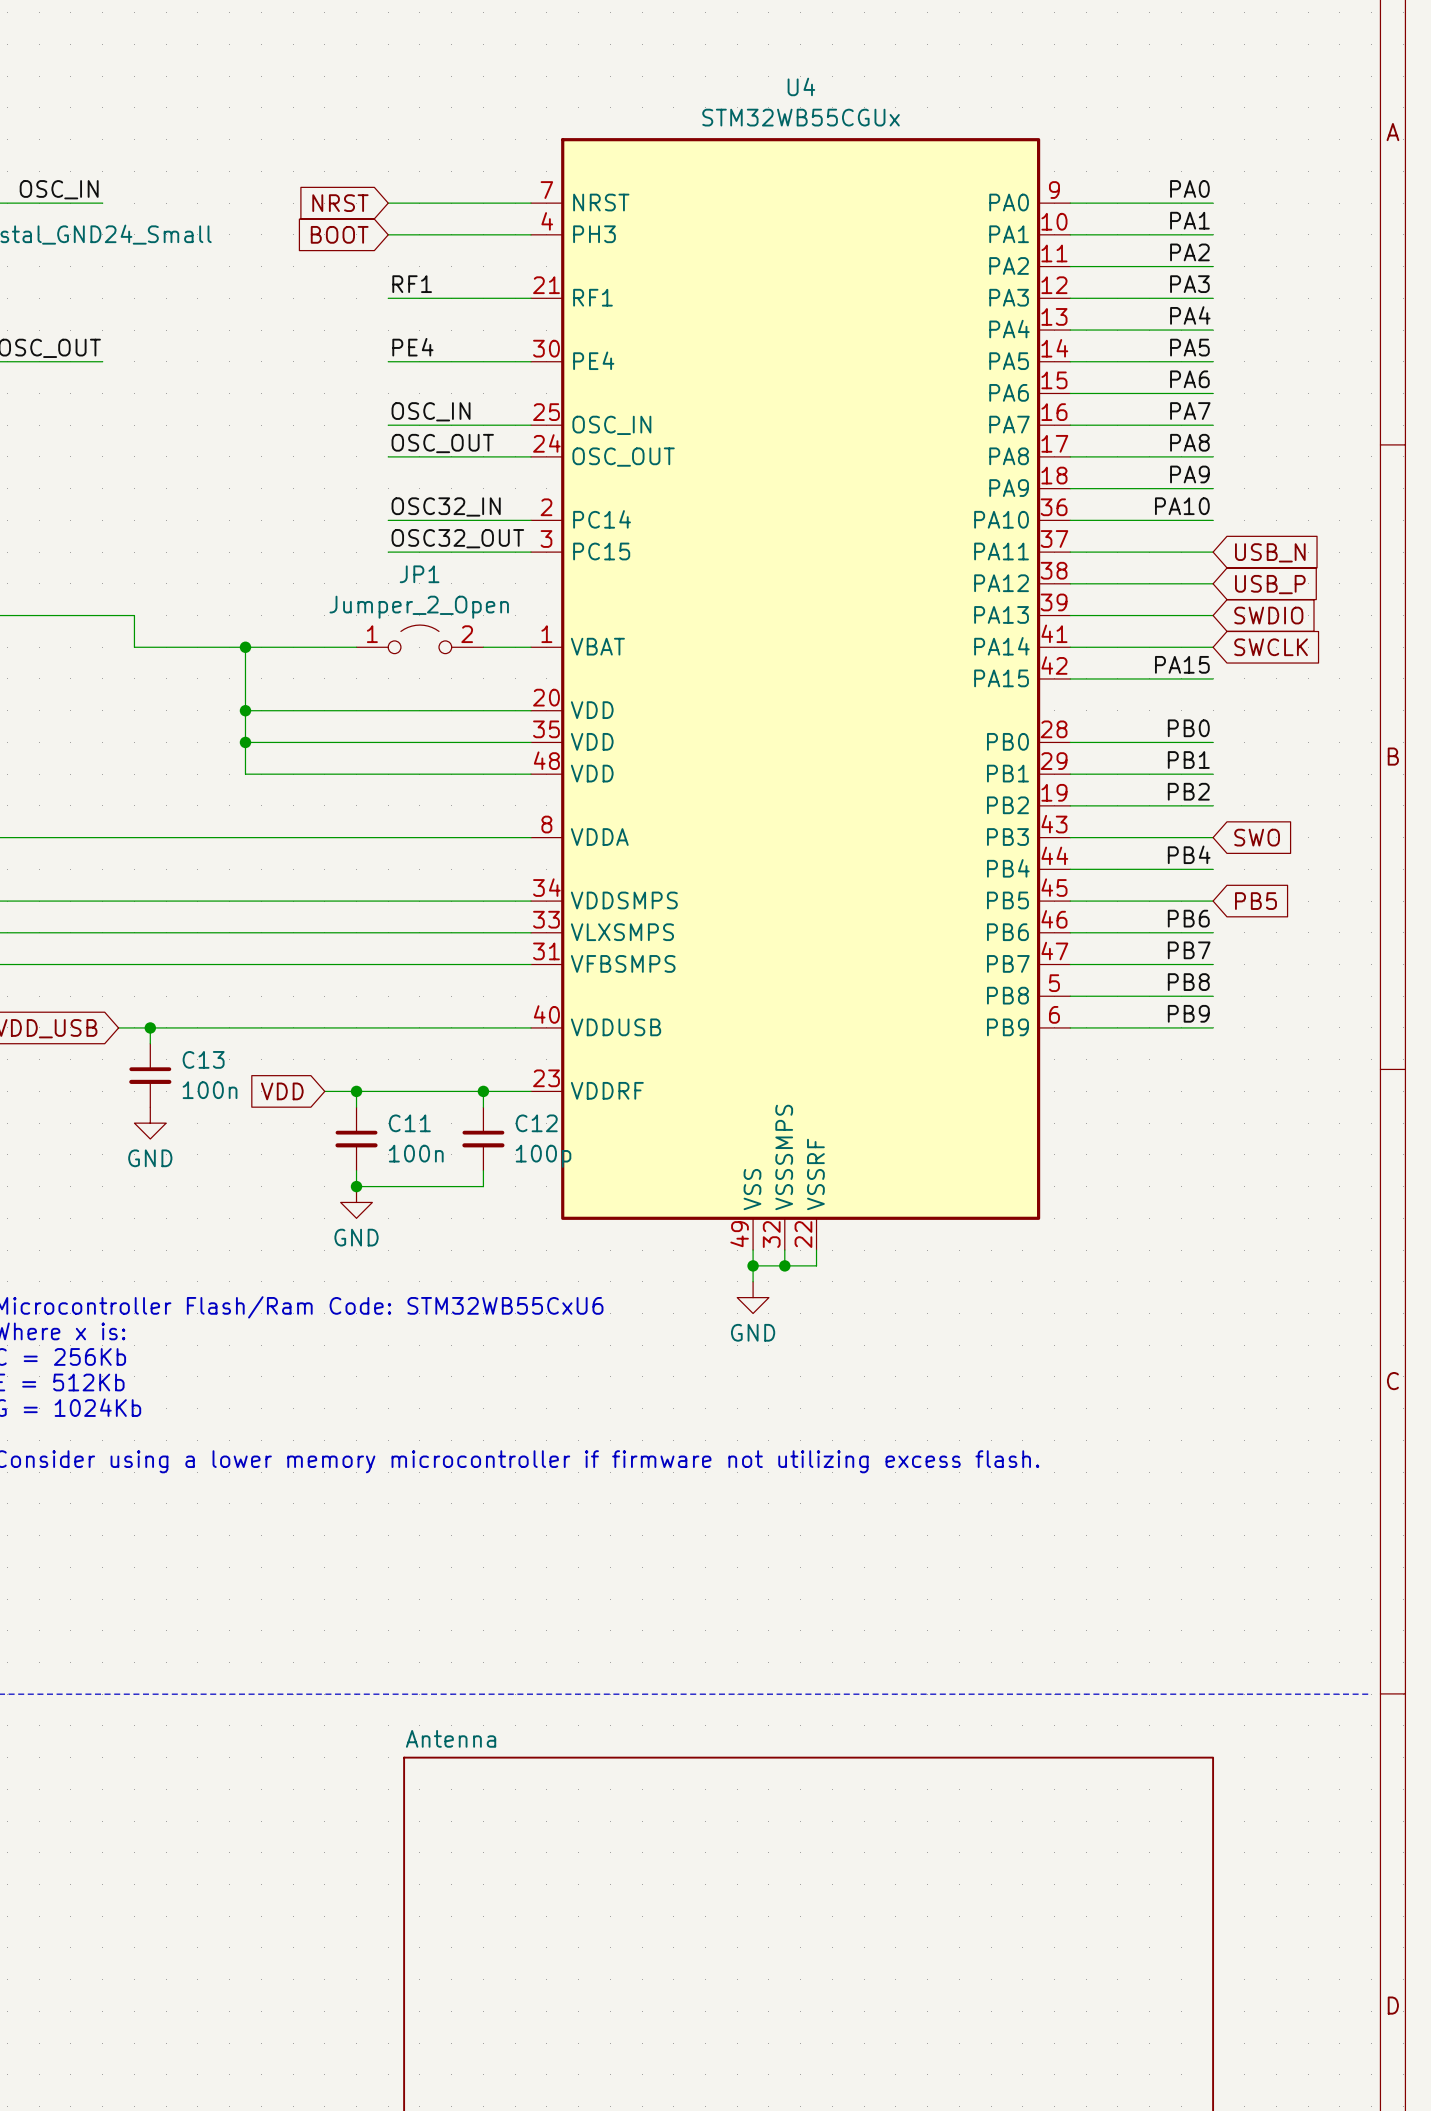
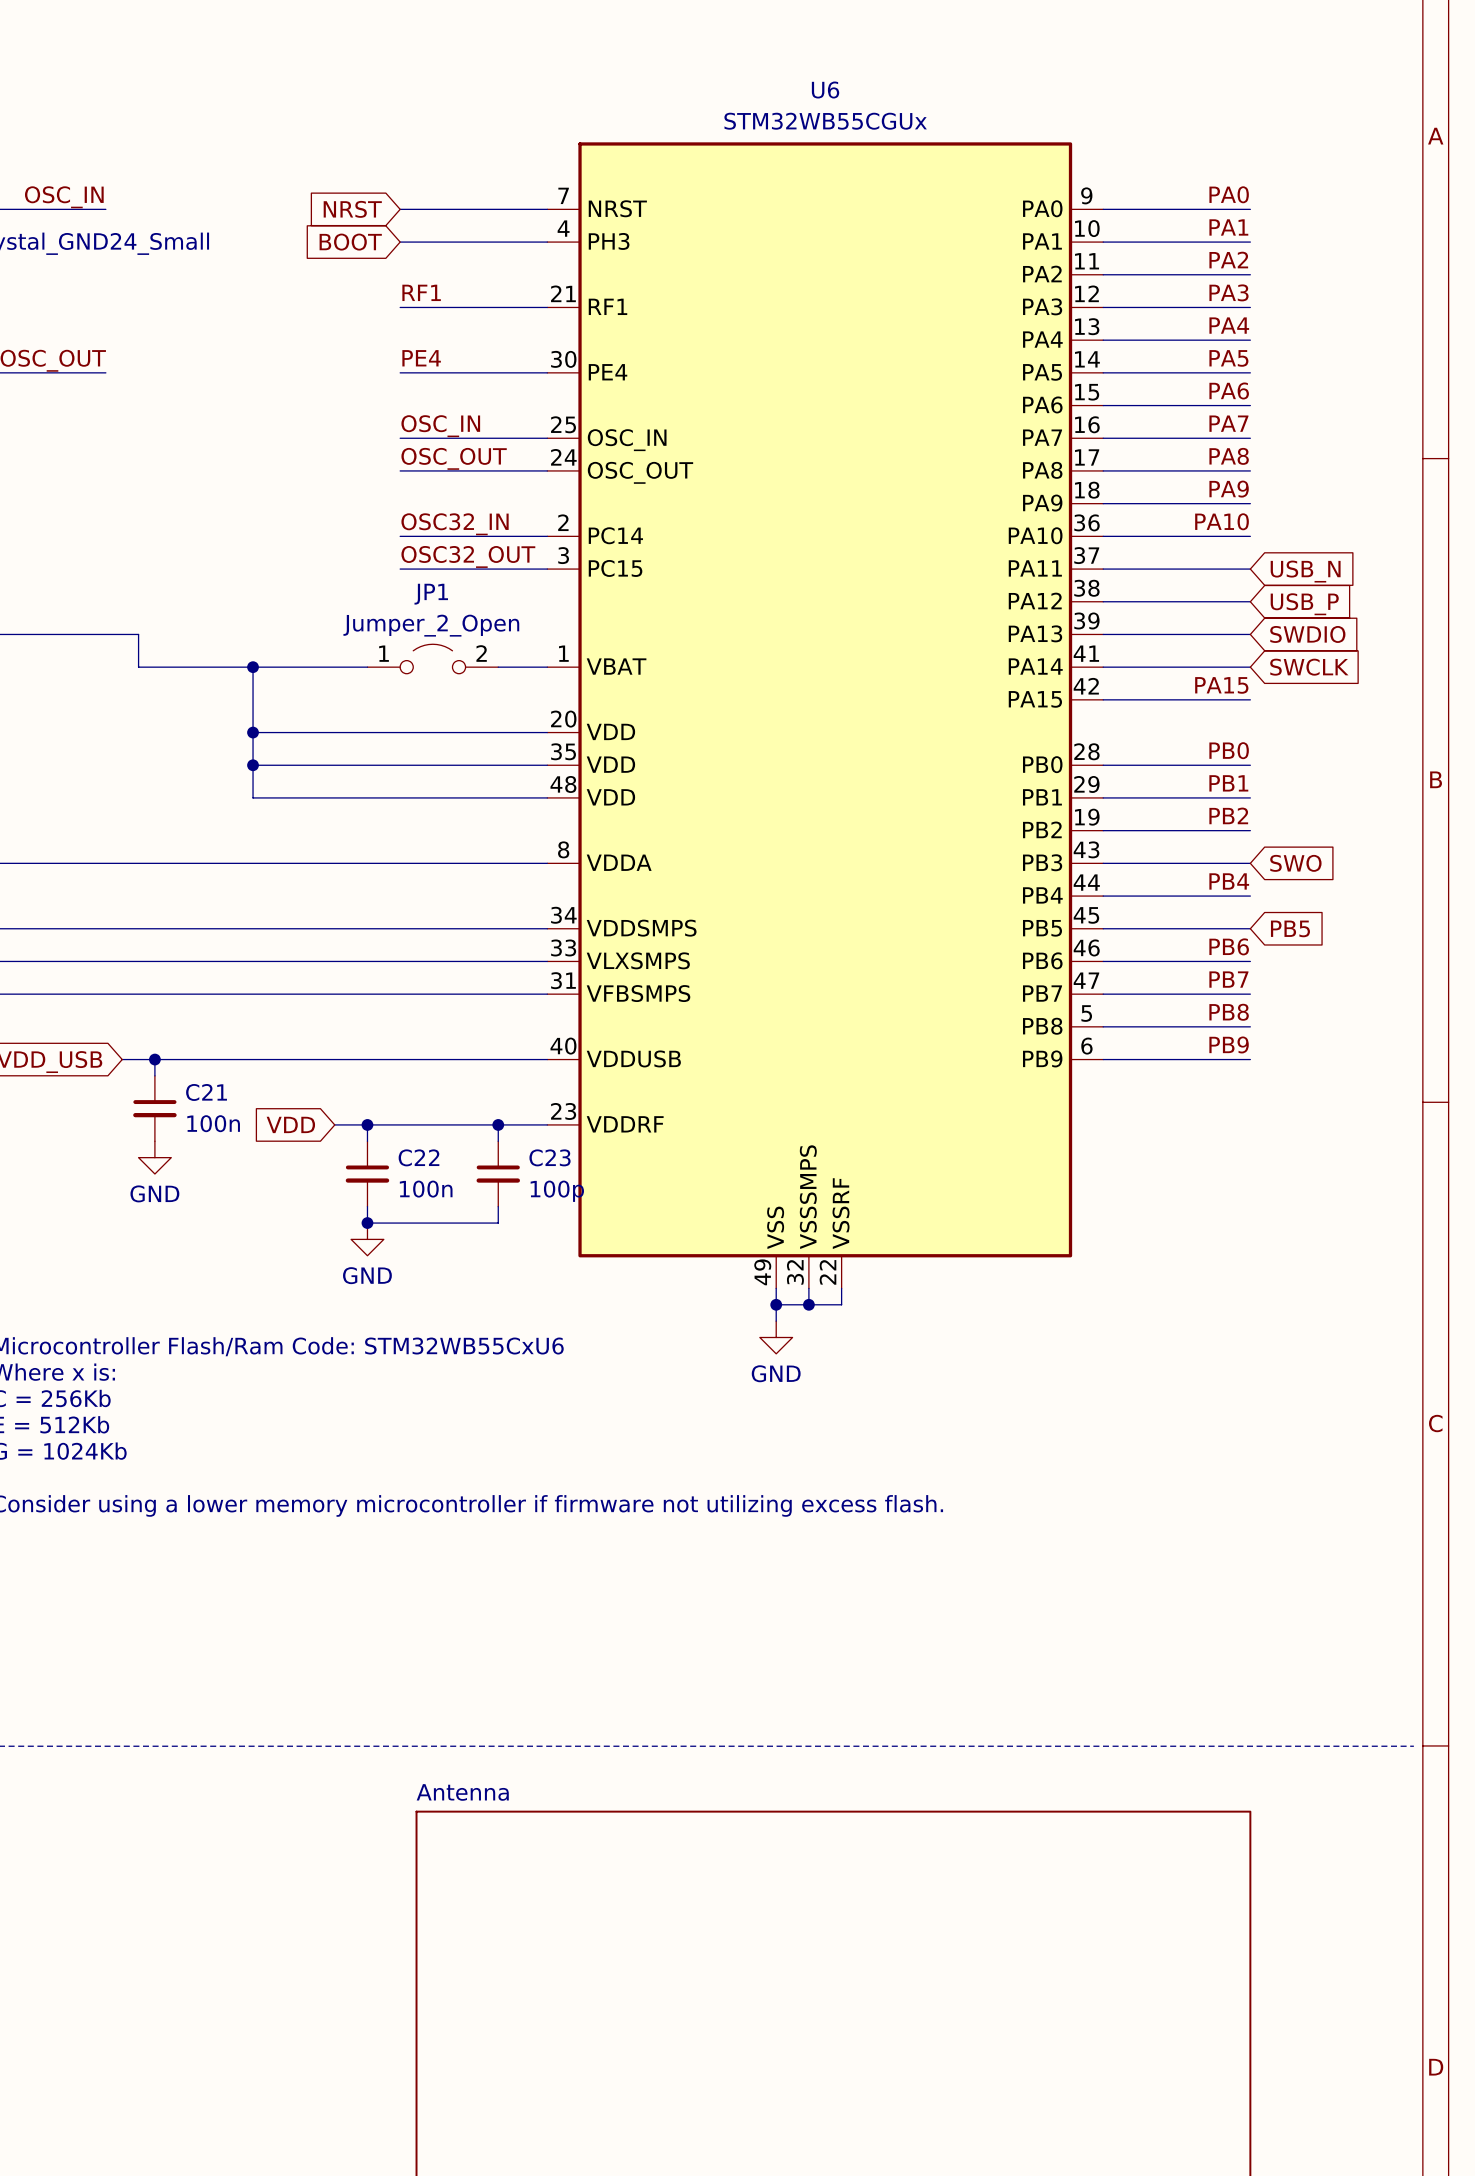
U4 name: U4 (801, 86) -> U6 (825, 90)
C13 name: C13 (203, 1059) -> C21 (206, 1092)
C11 name: C11 (409, 1123) -> C22 (418, 1157)
C12 name: C12 (536, 1123) -> C23 (550, 1157)

